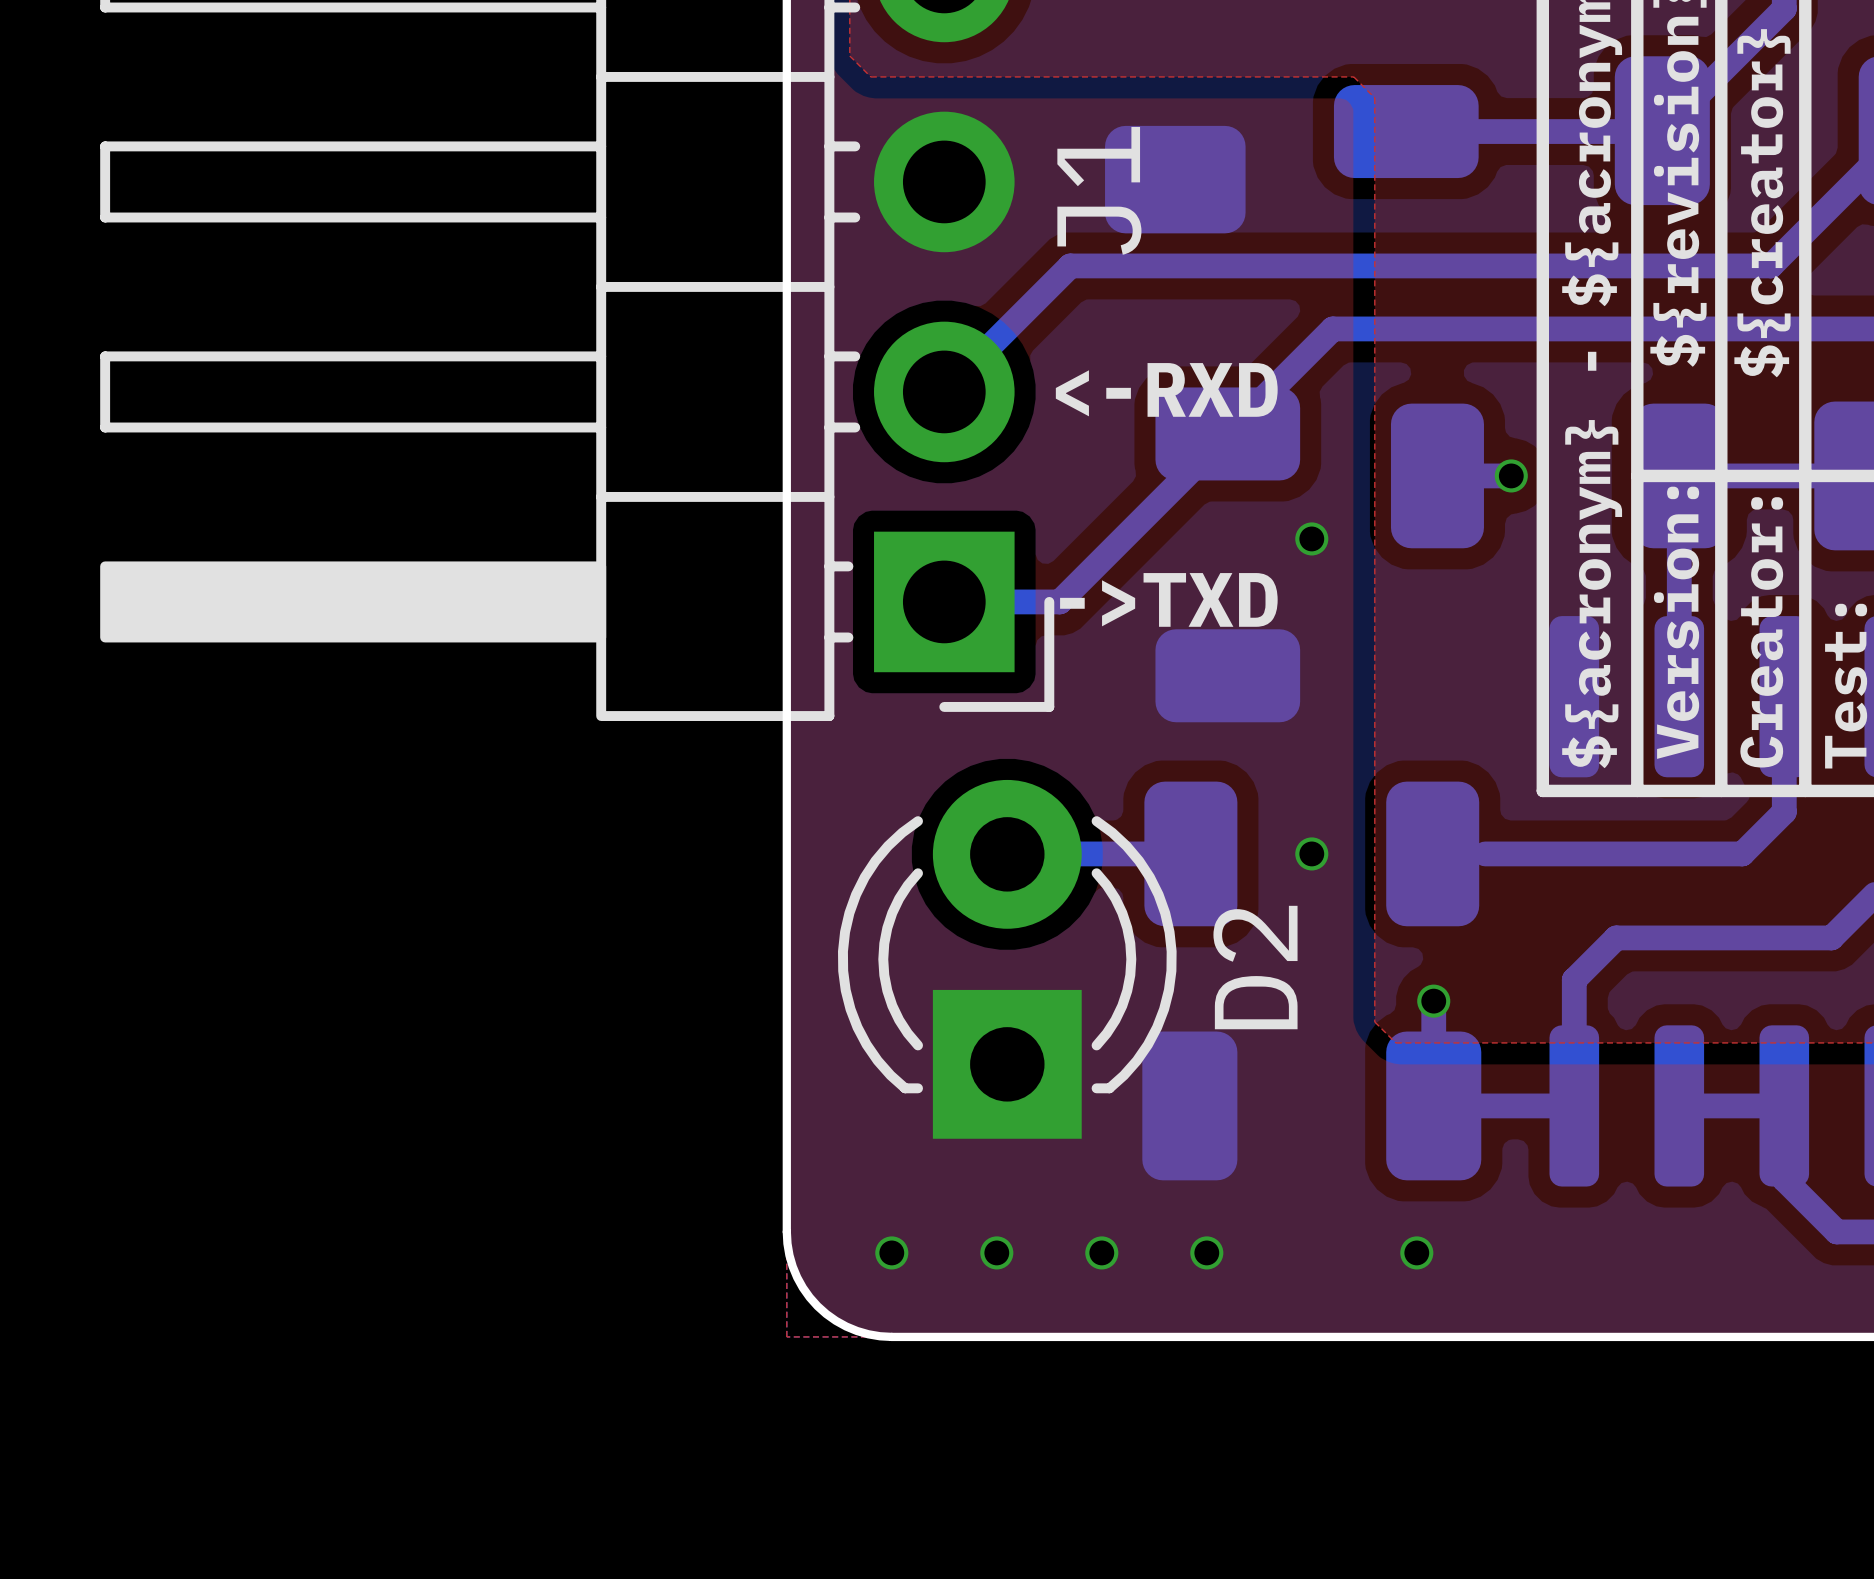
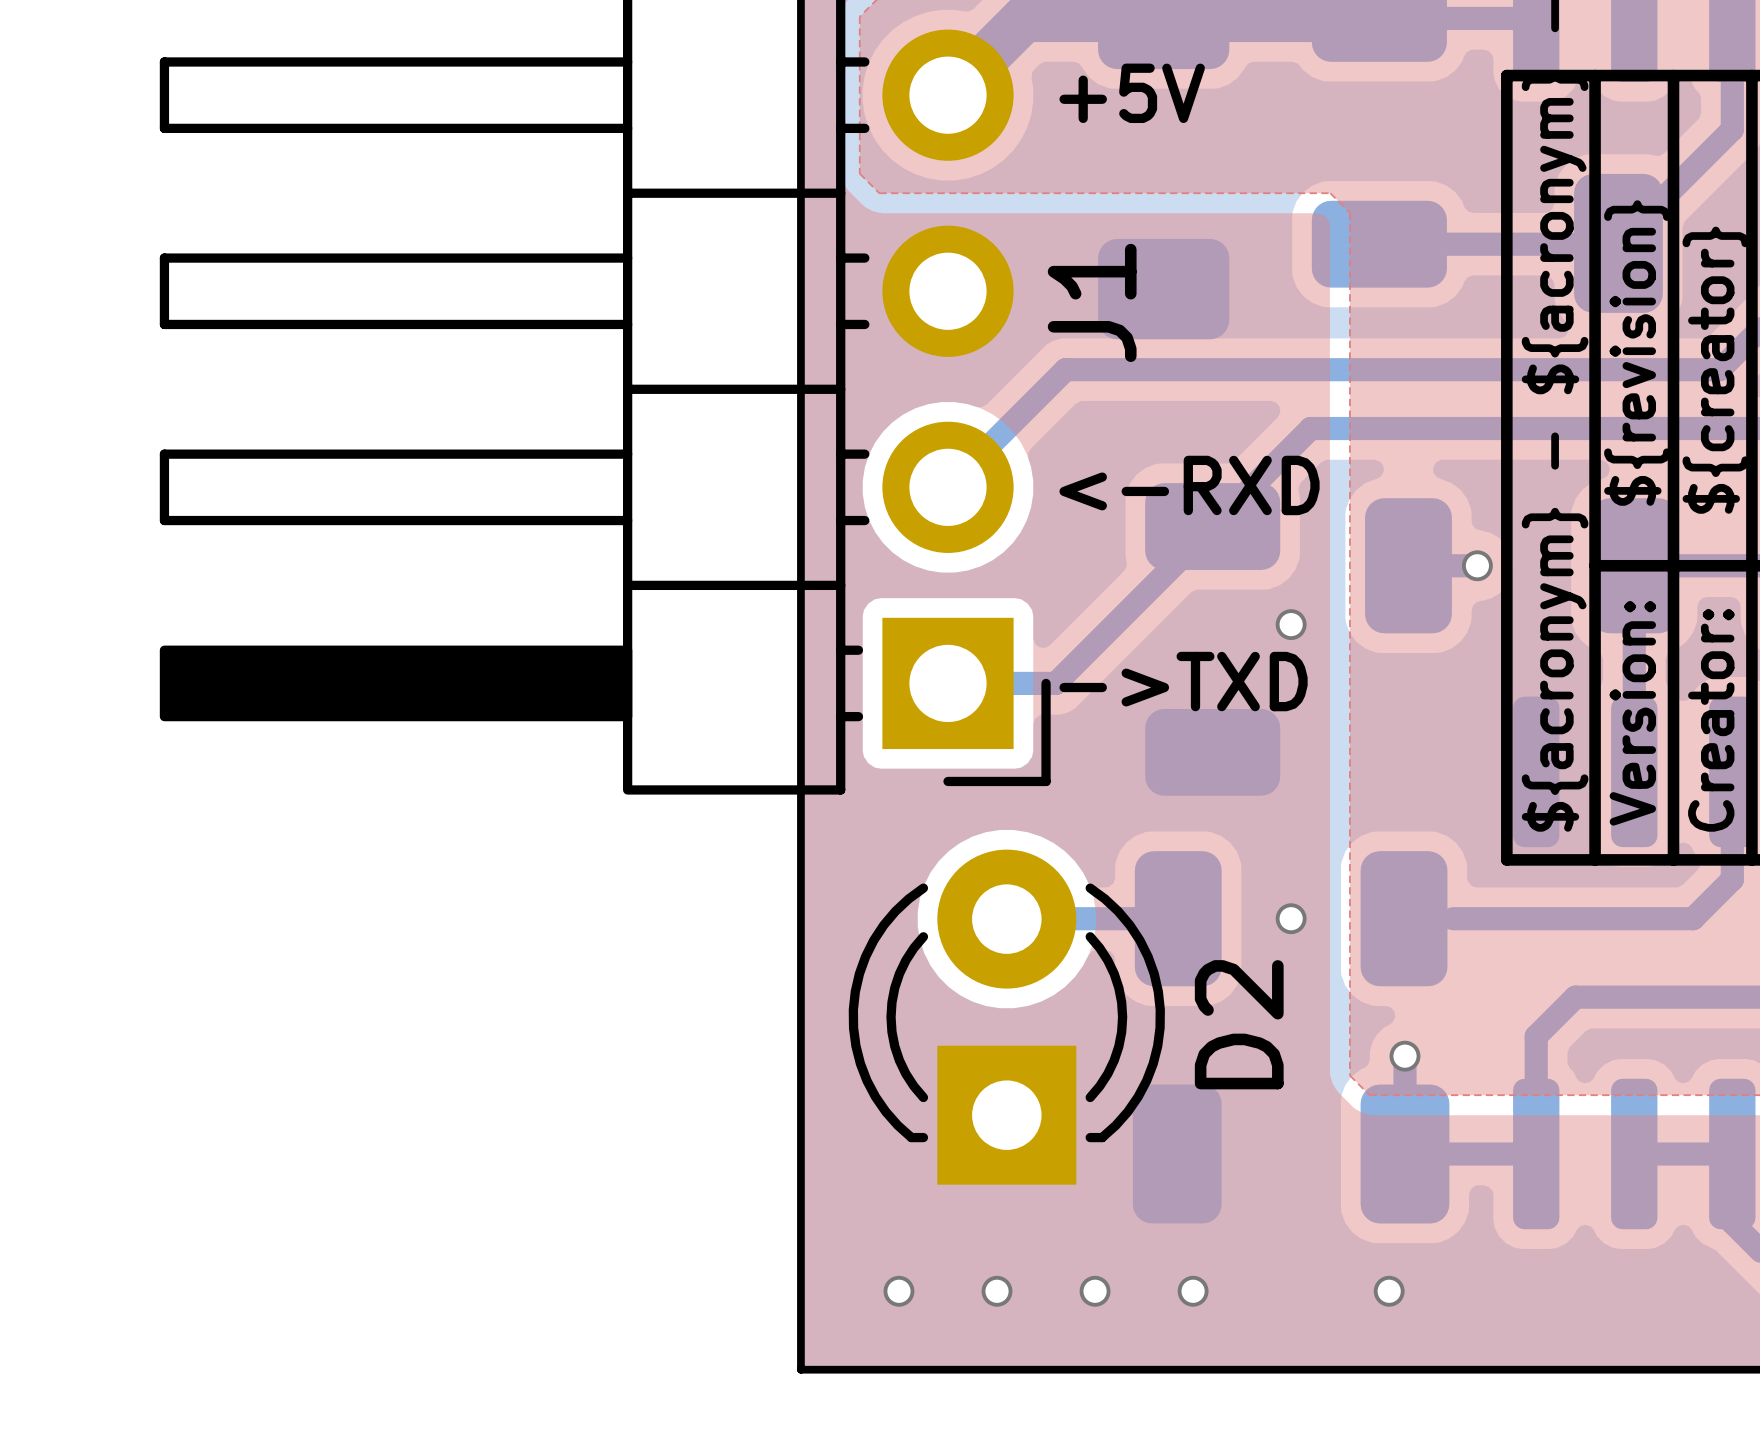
board edge: (786, 1231) (789, 1255) (797, 1277) (817, 1306) (835, 1320) (857, 1331) (891, 1336) -> (800, 1271) (800, 1369) (898, 1369)

